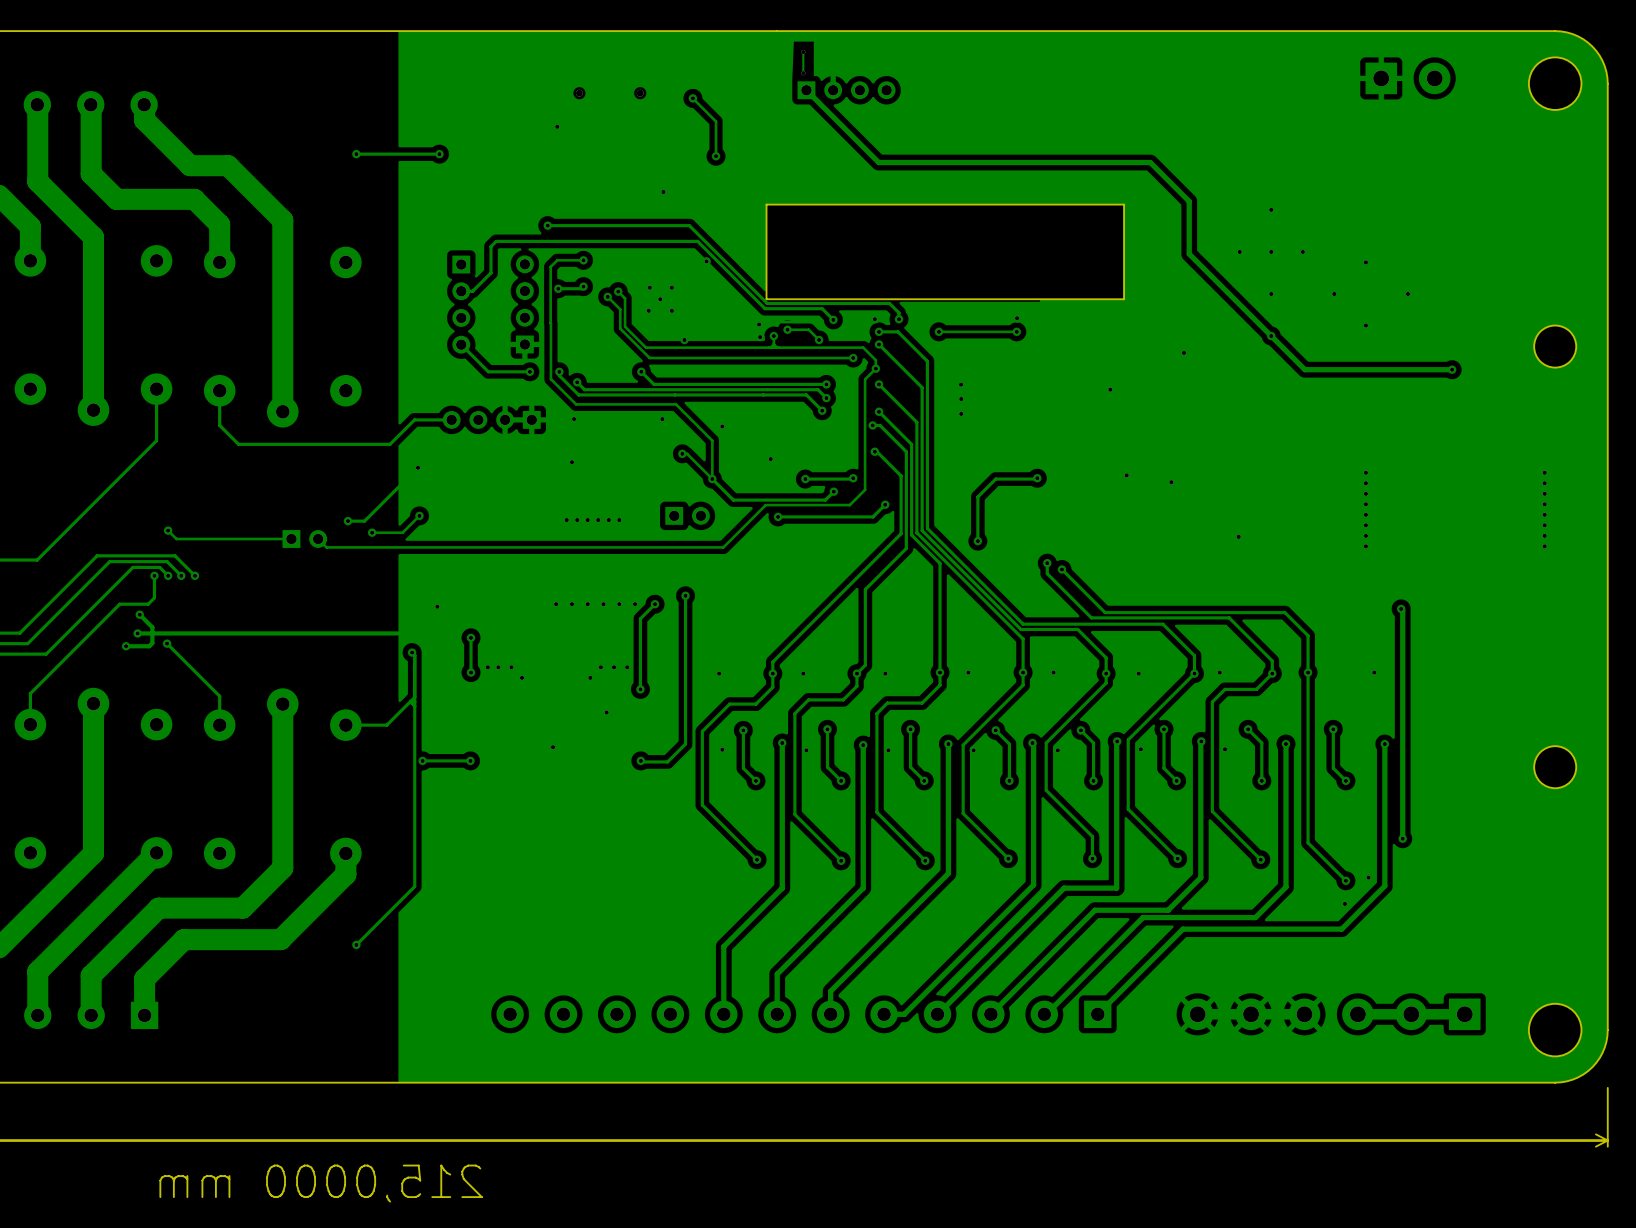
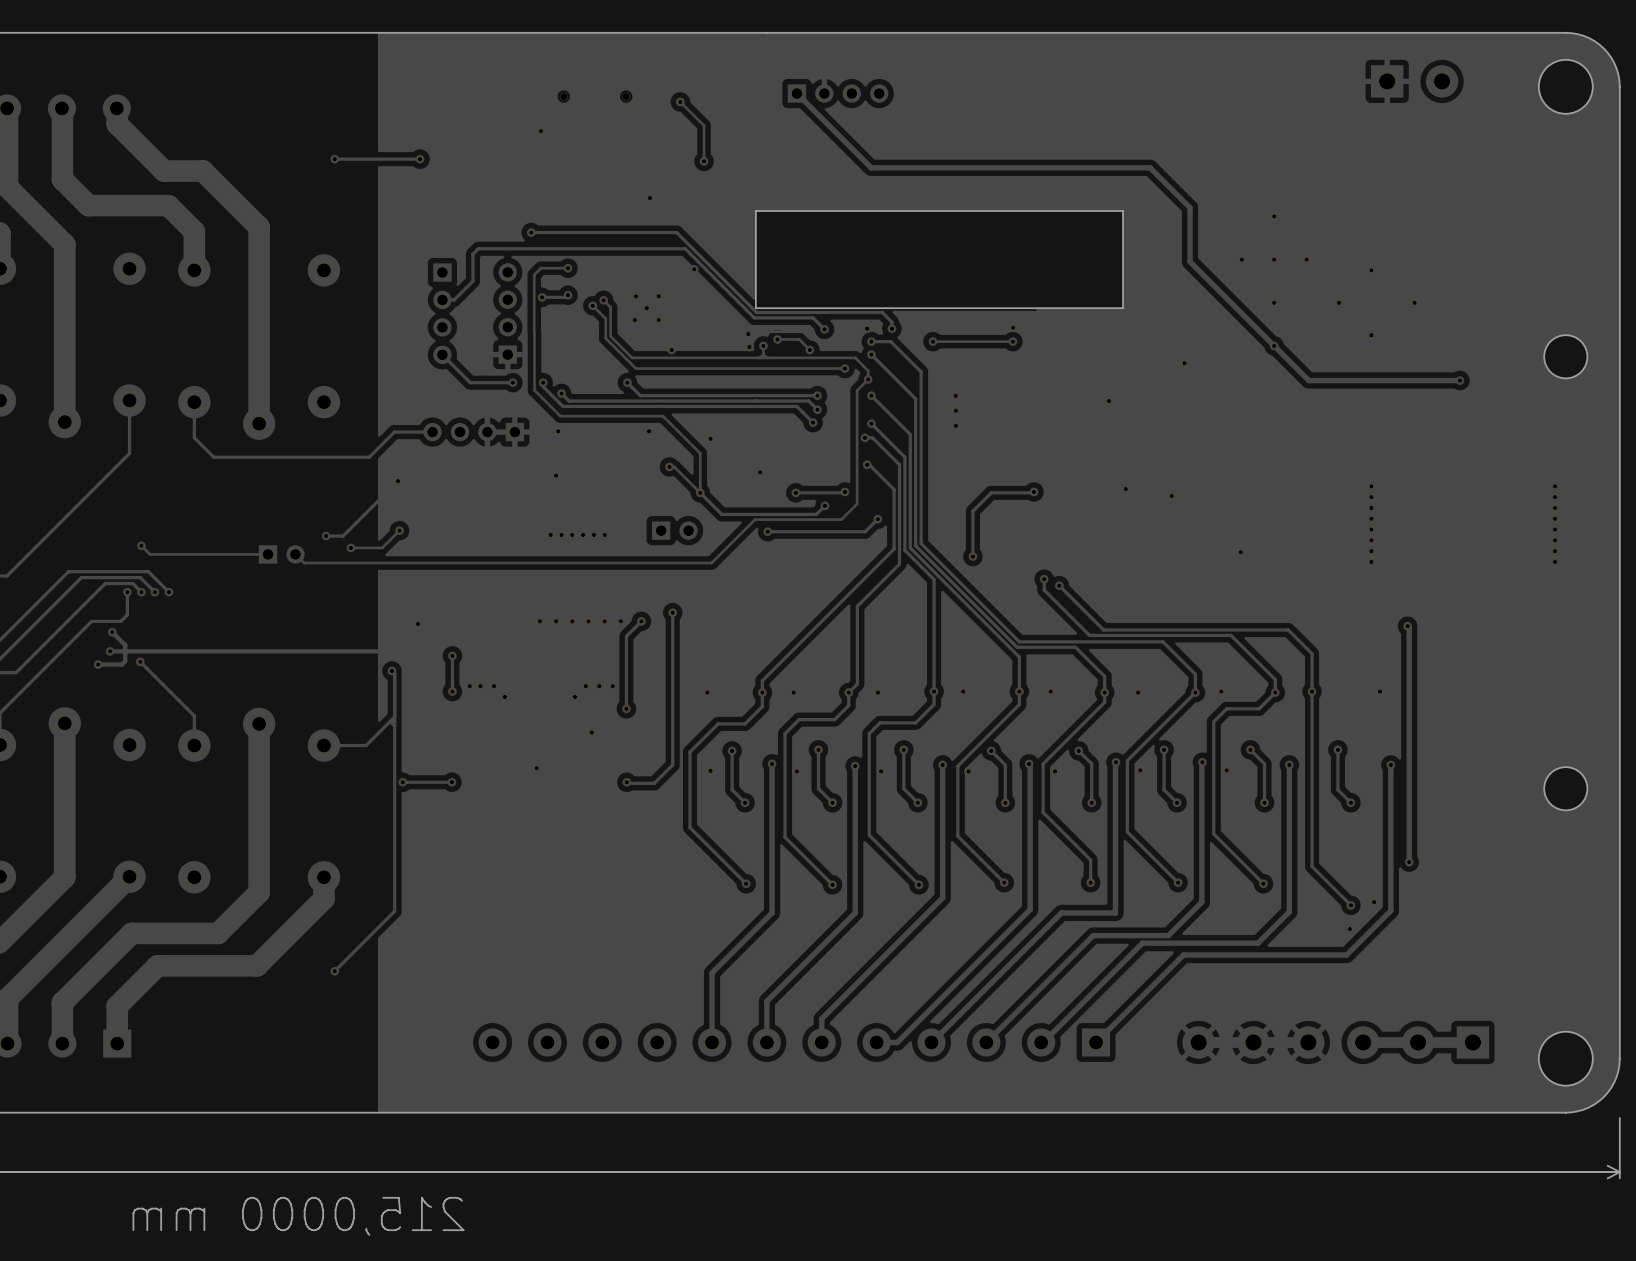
drawing shape: [398, 31, 1608, 1083] -> [377, 32, 1620, 1113]
track: (803, 52) (803, 73) -> none
via: (803, 52) -> none
via: (803, 73) -> none

